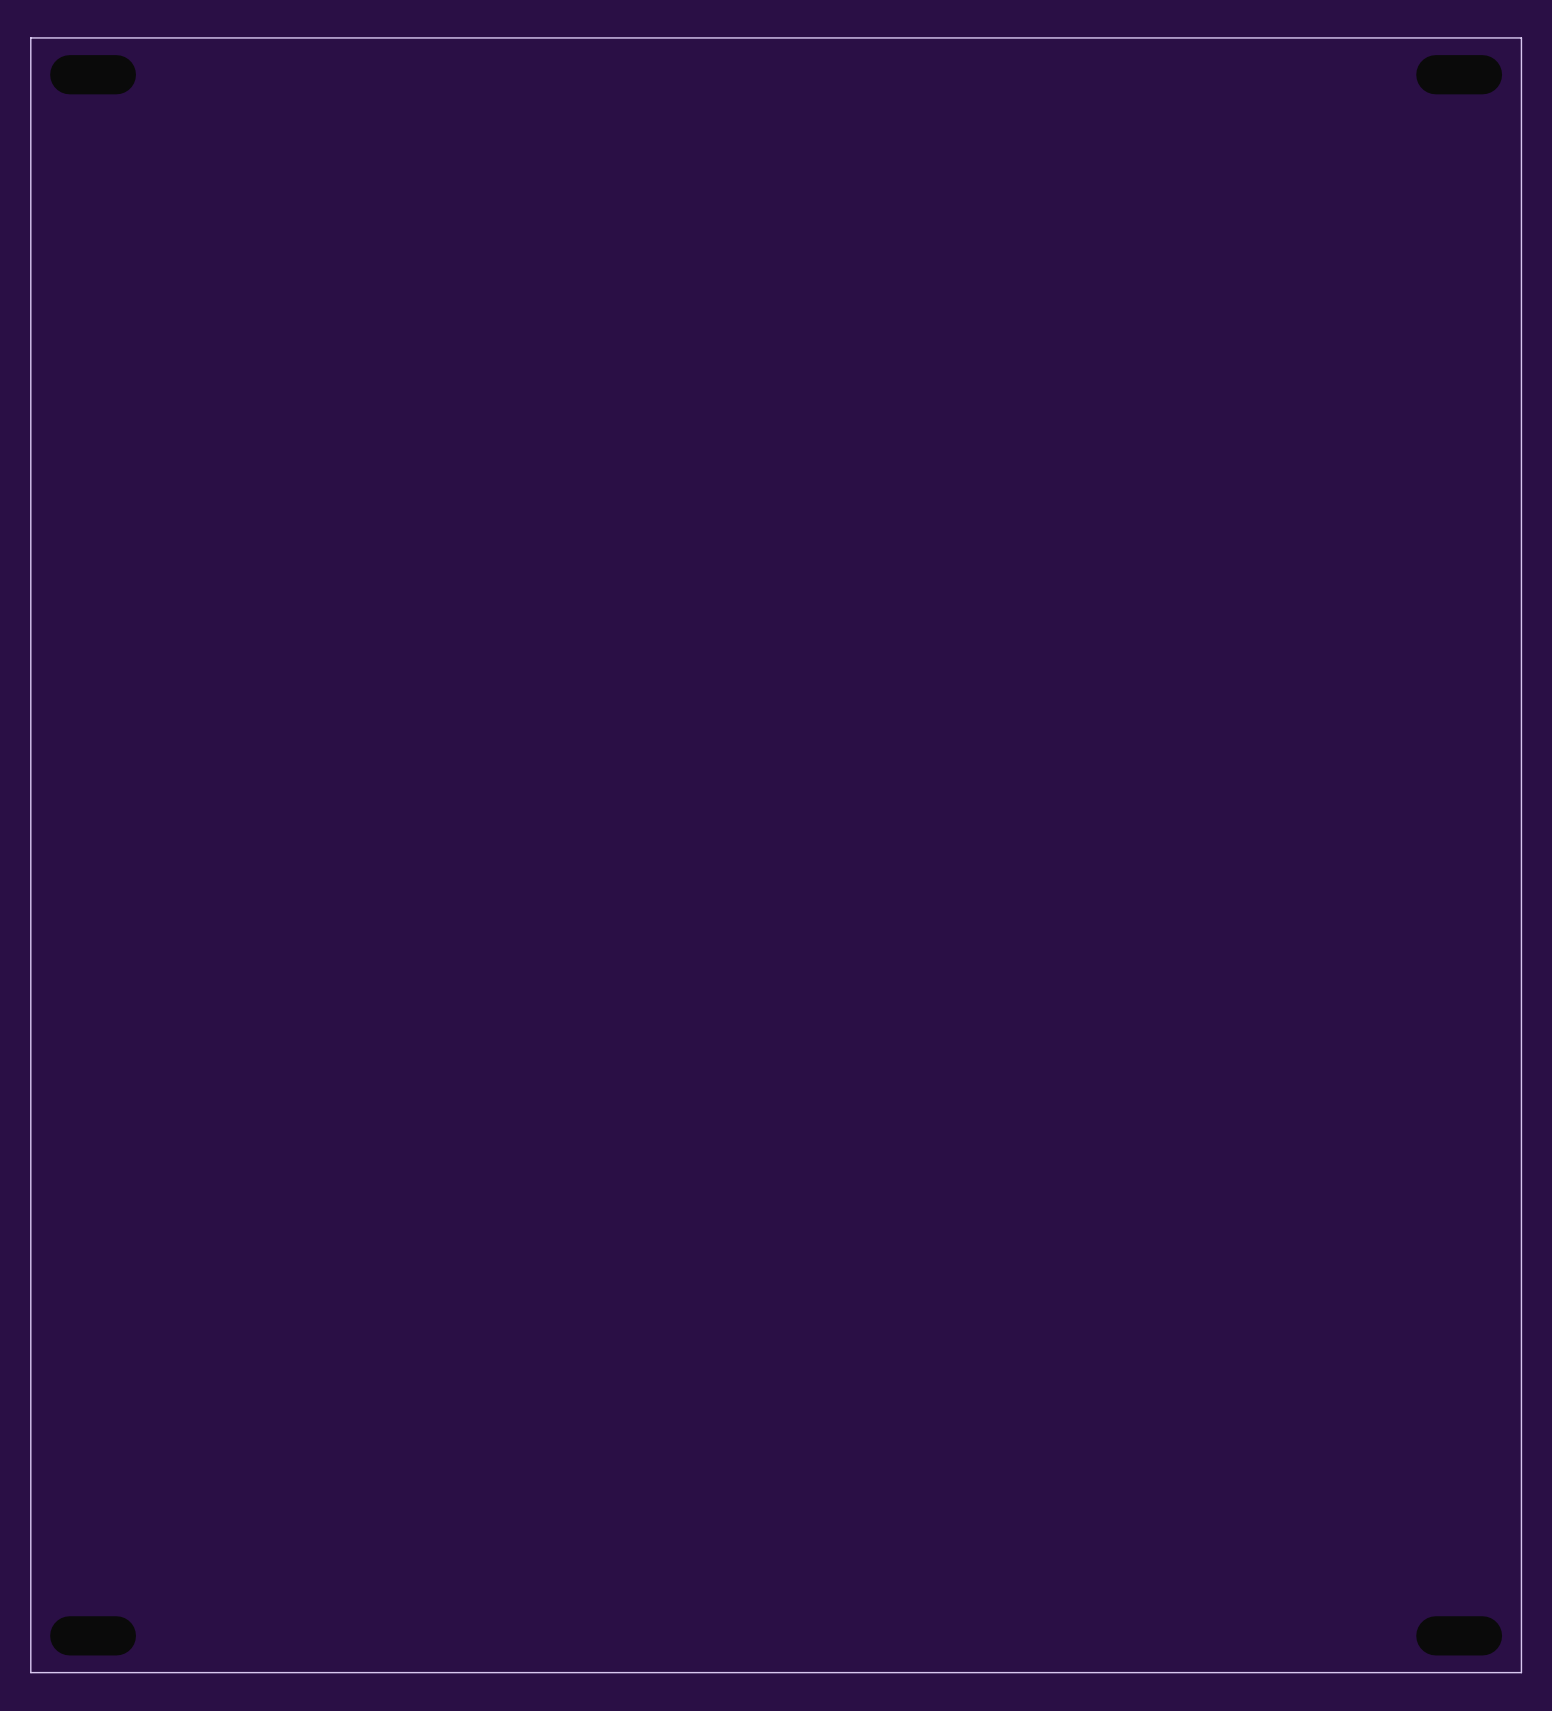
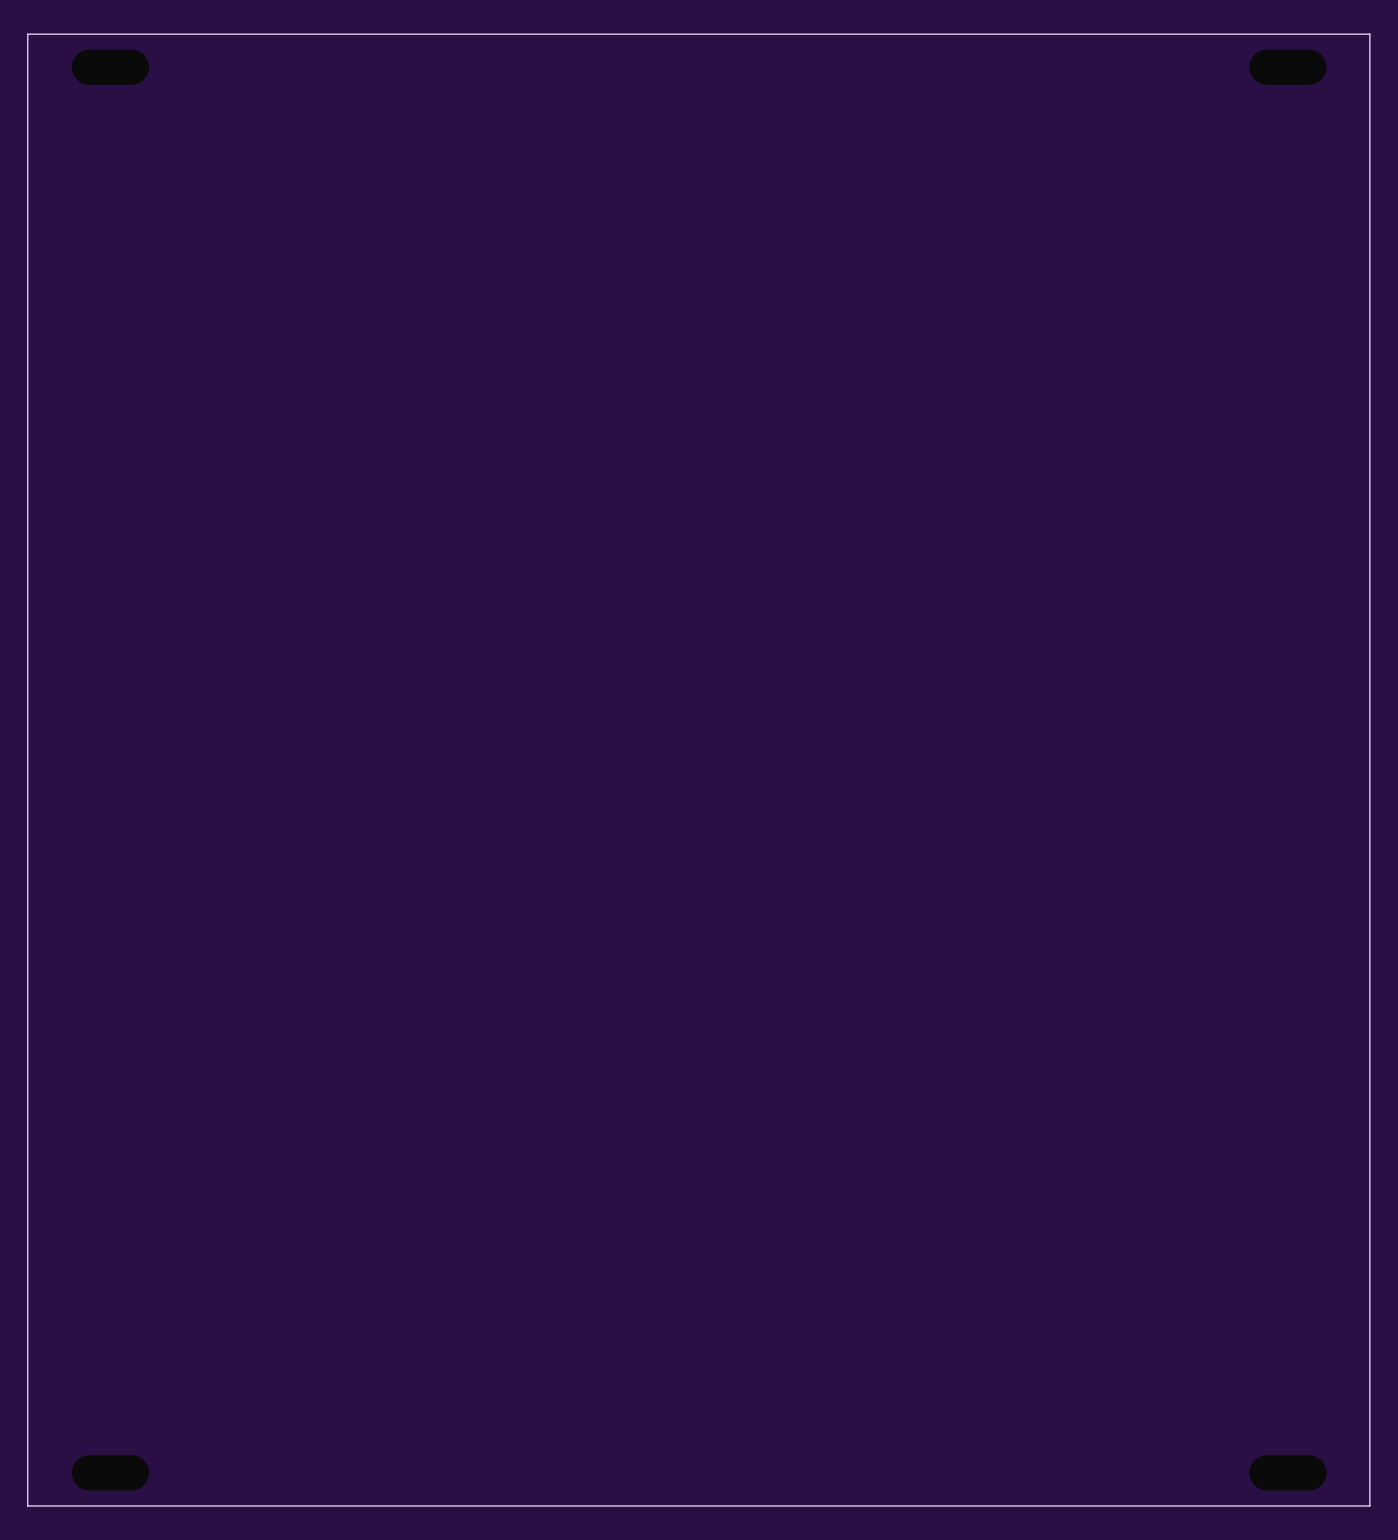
part position: (93, 74) -> (110, 67)
part position: (1459, 74) -> (1287, 67)
part position: (93, 1635) -> (110, 1472)
part position: (1459, 1635) -> (1287, 1472)

